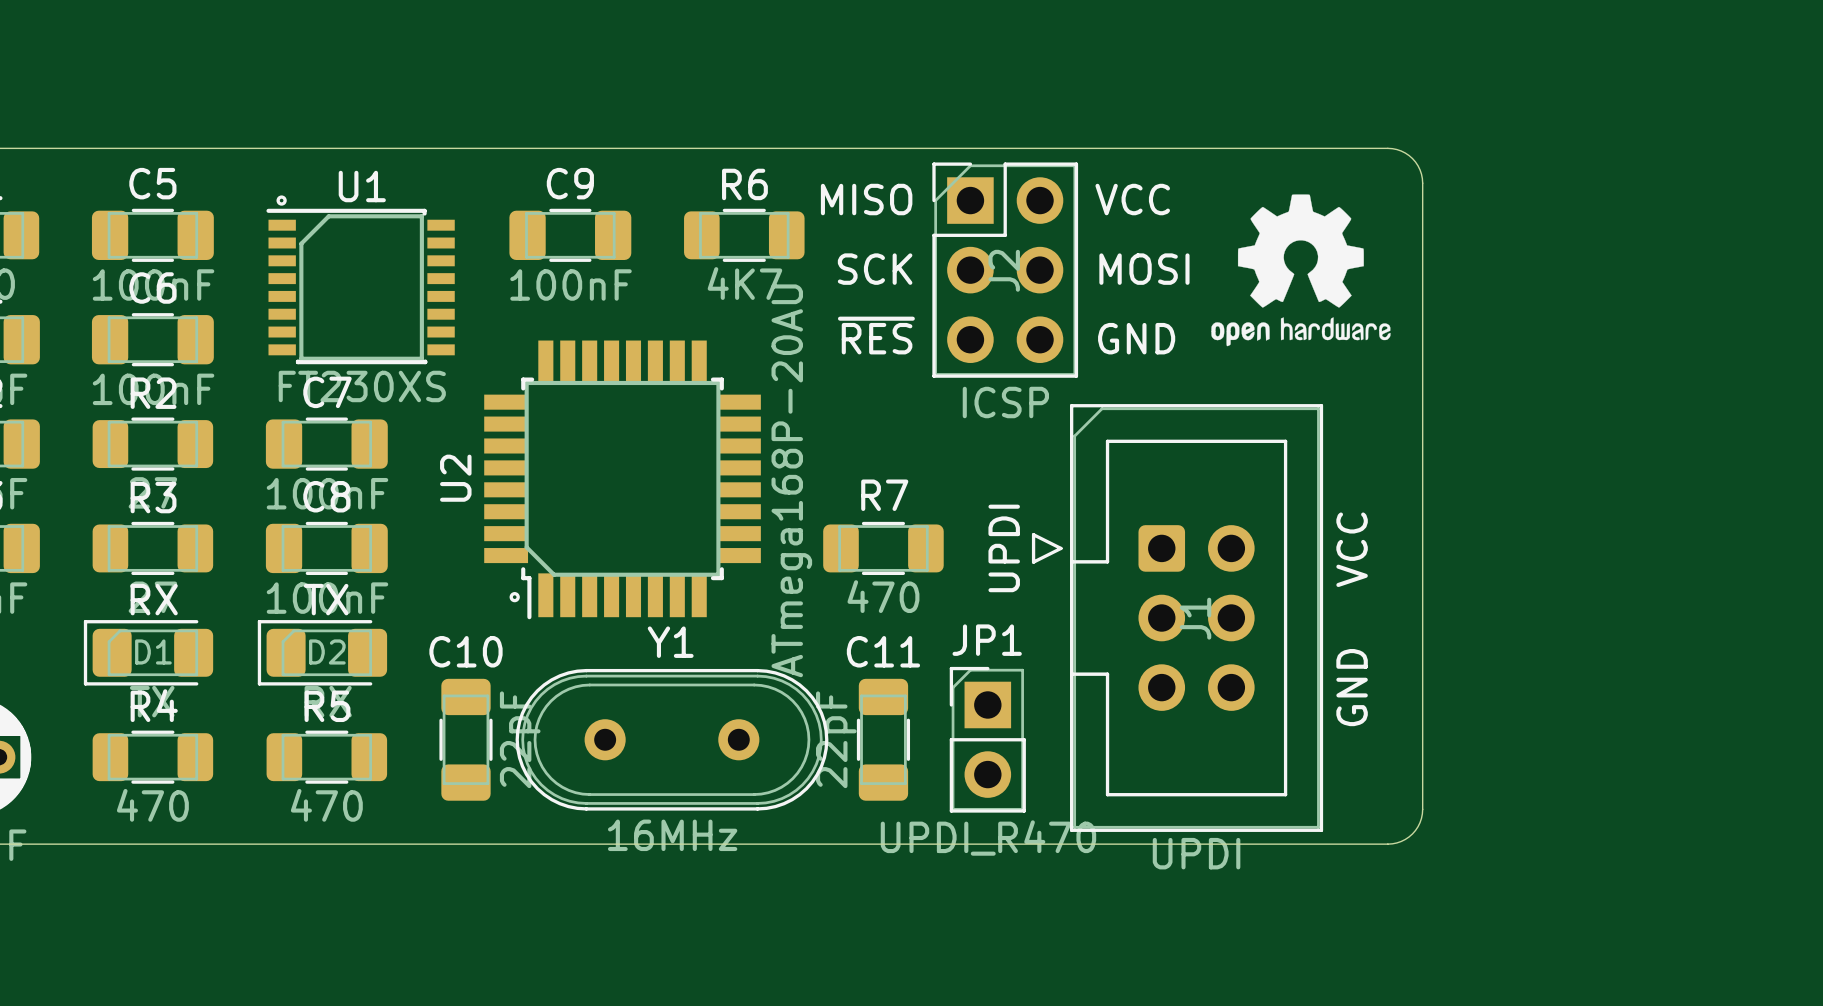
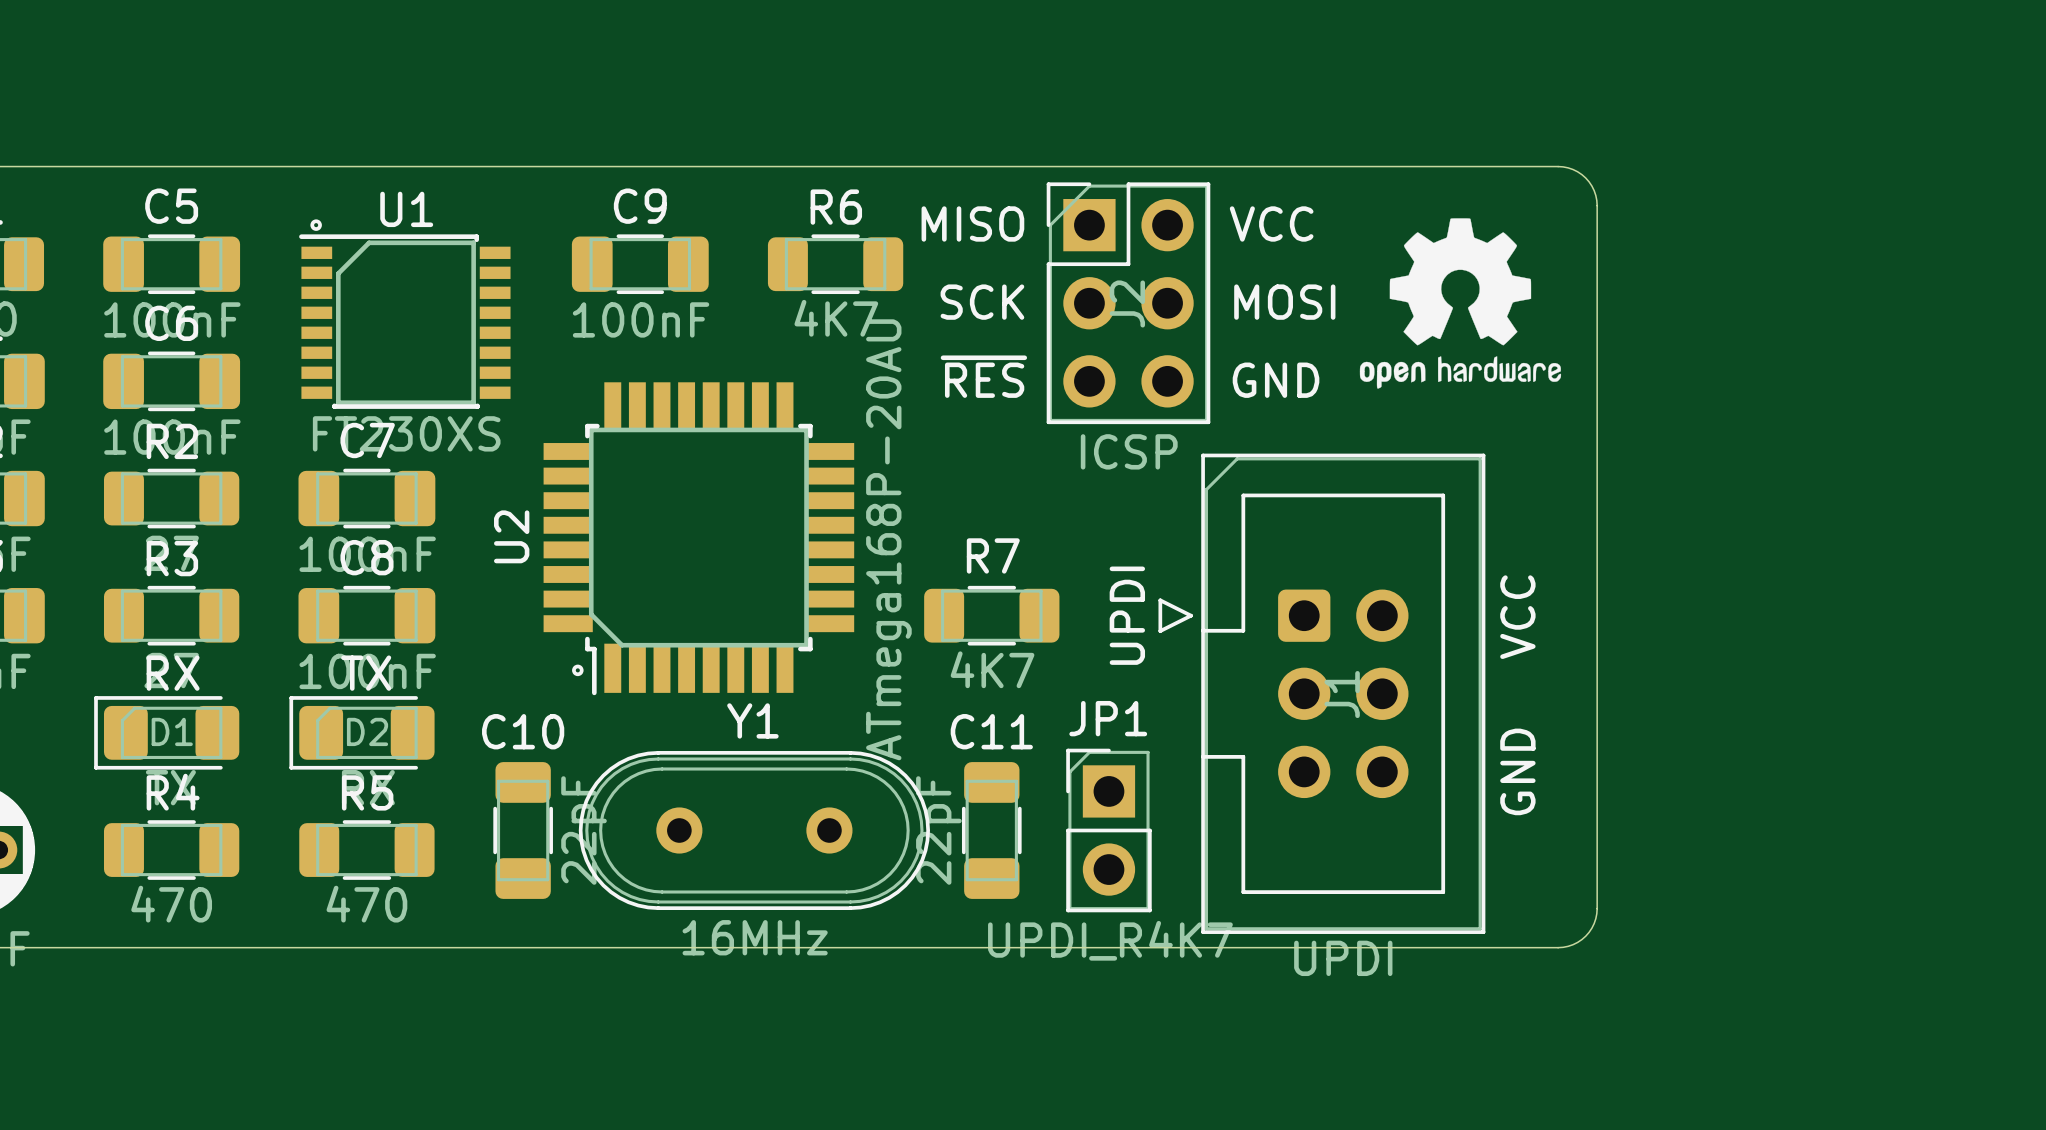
R7 value: 470 (883, 596) -> 4K7 (992, 669)
JP1 value: UPDI_R470 (988, 838) -> UPDI_R4K7 (1110, 940)

